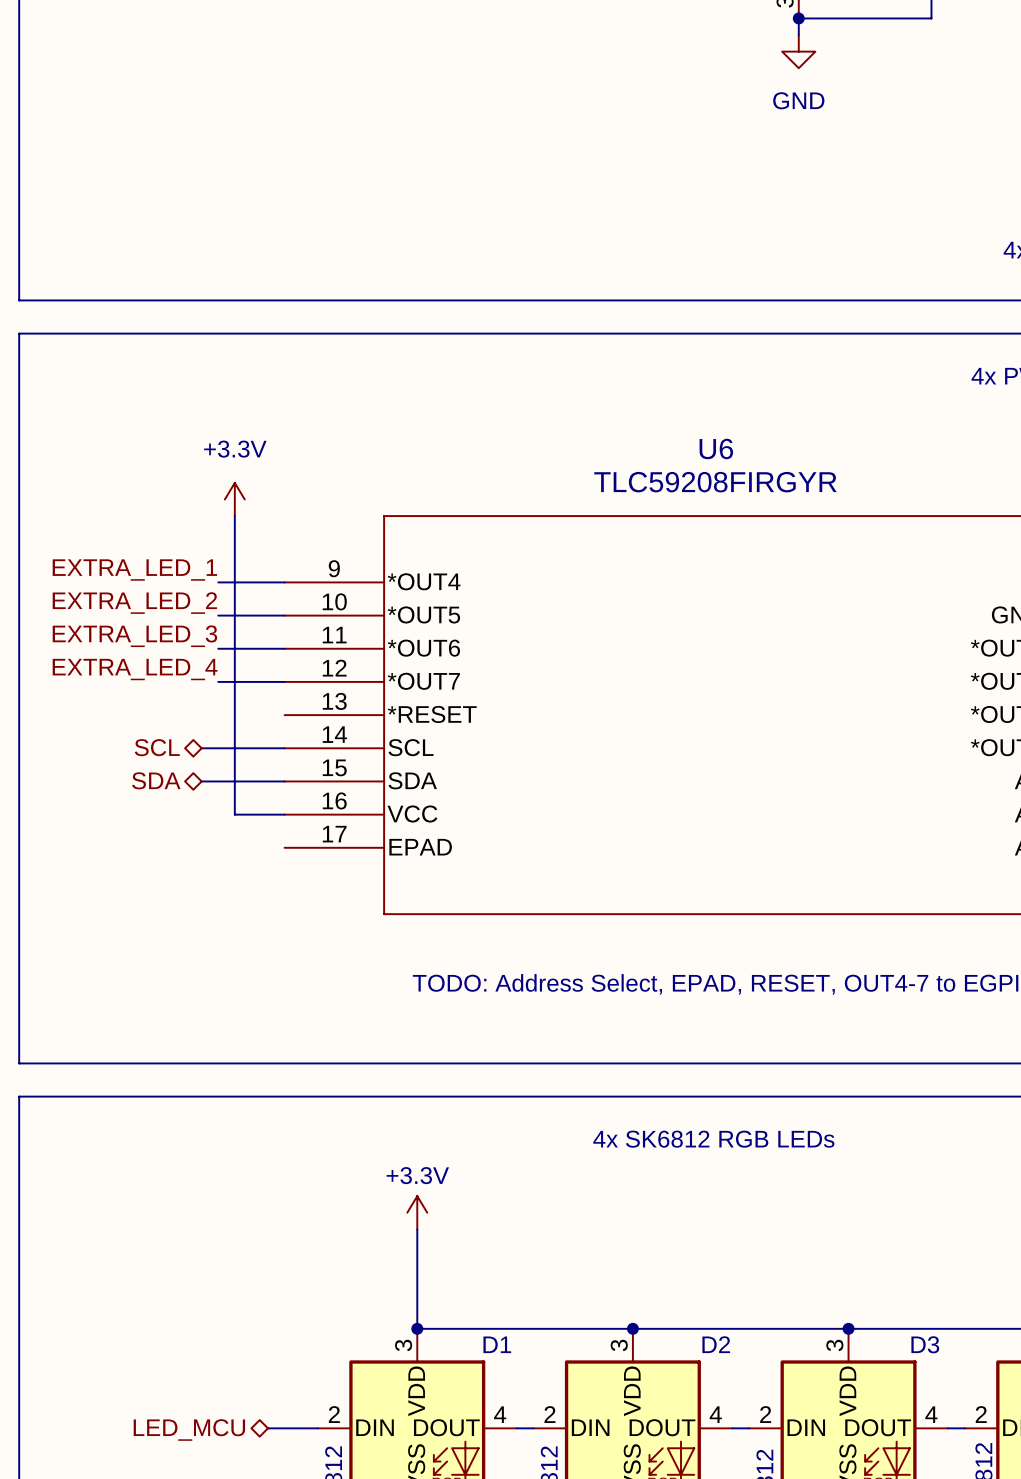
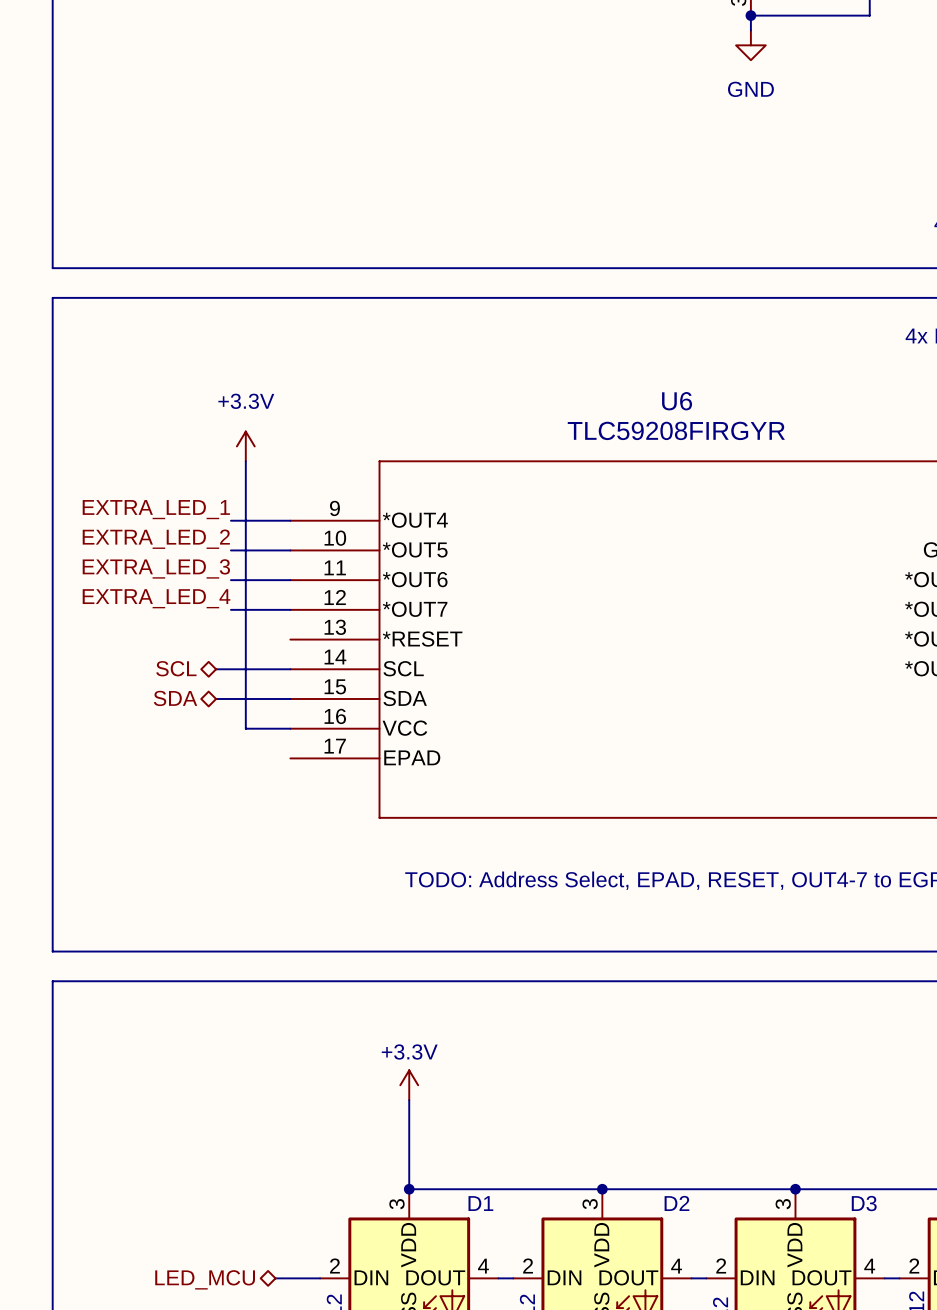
text: 4x SK6812 RGB LEDs (713, 1139) -> none

